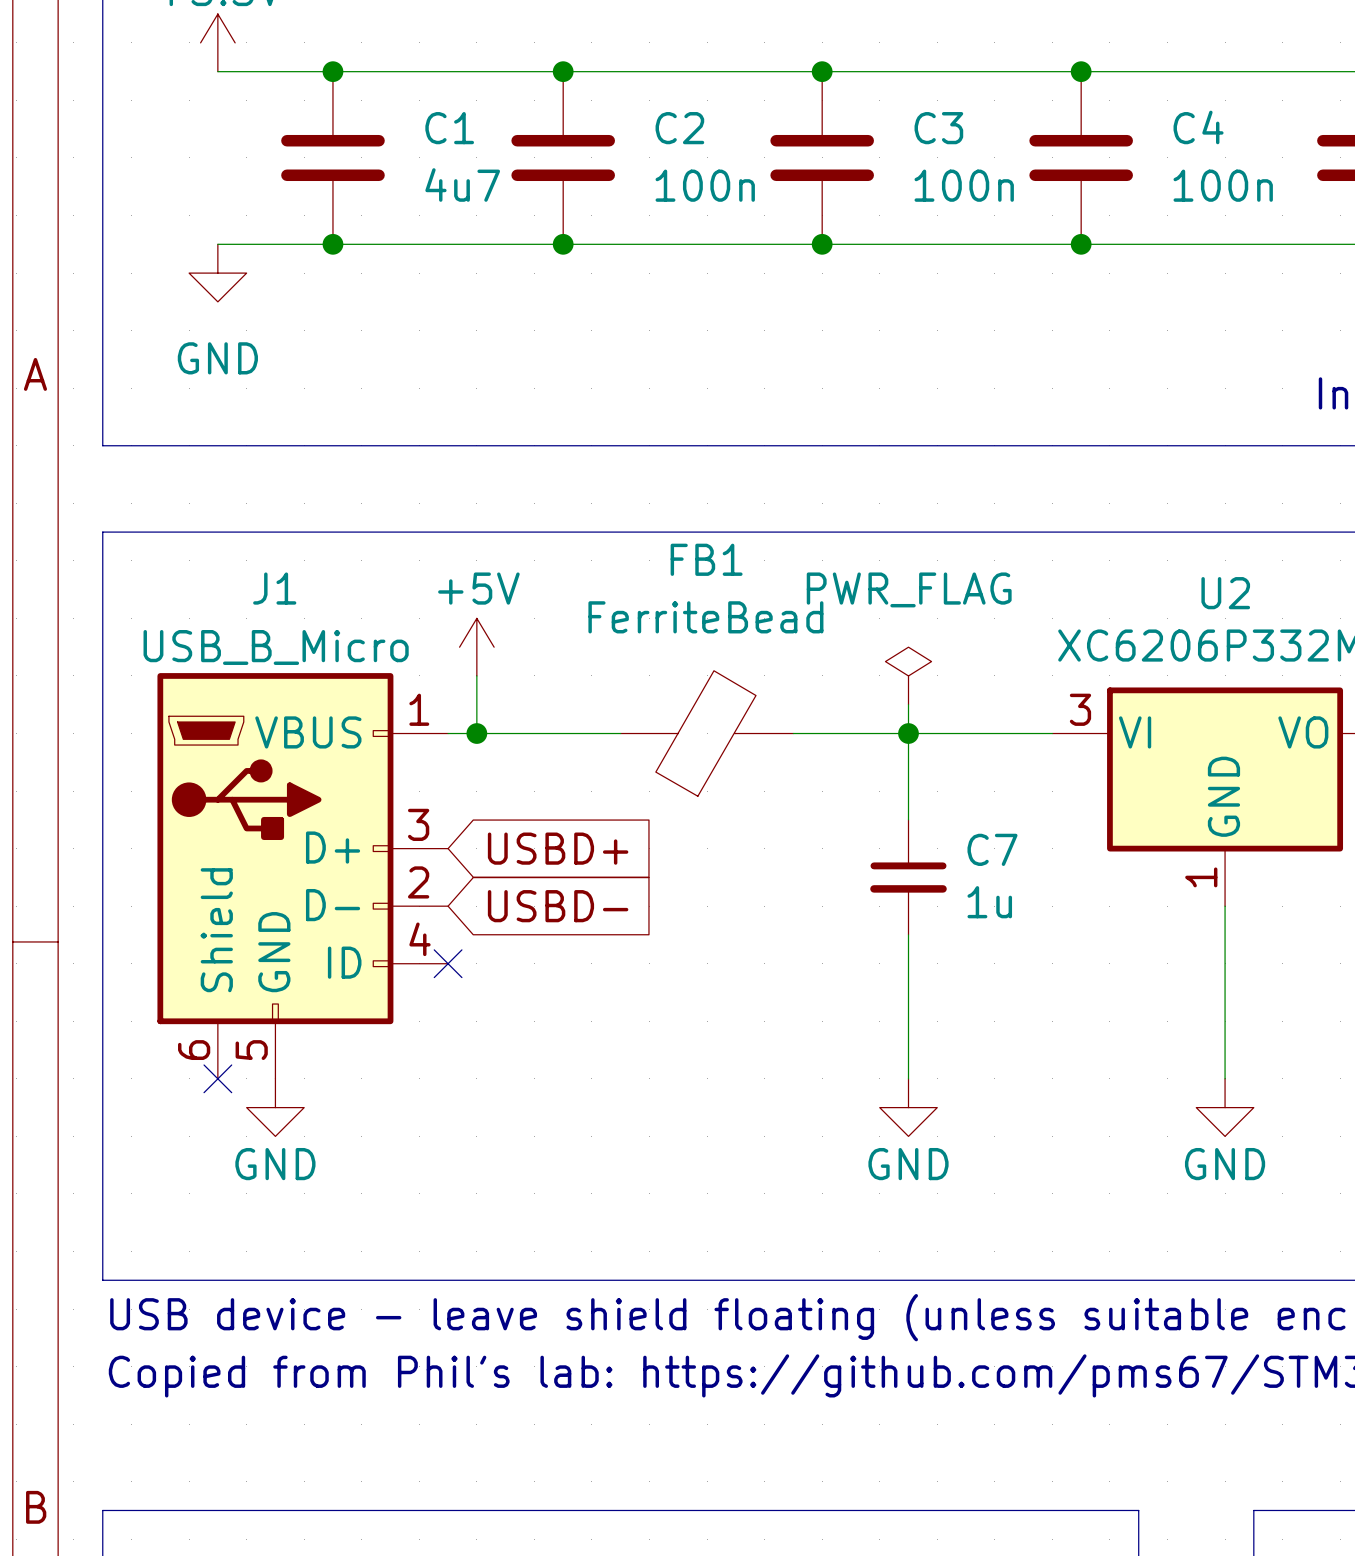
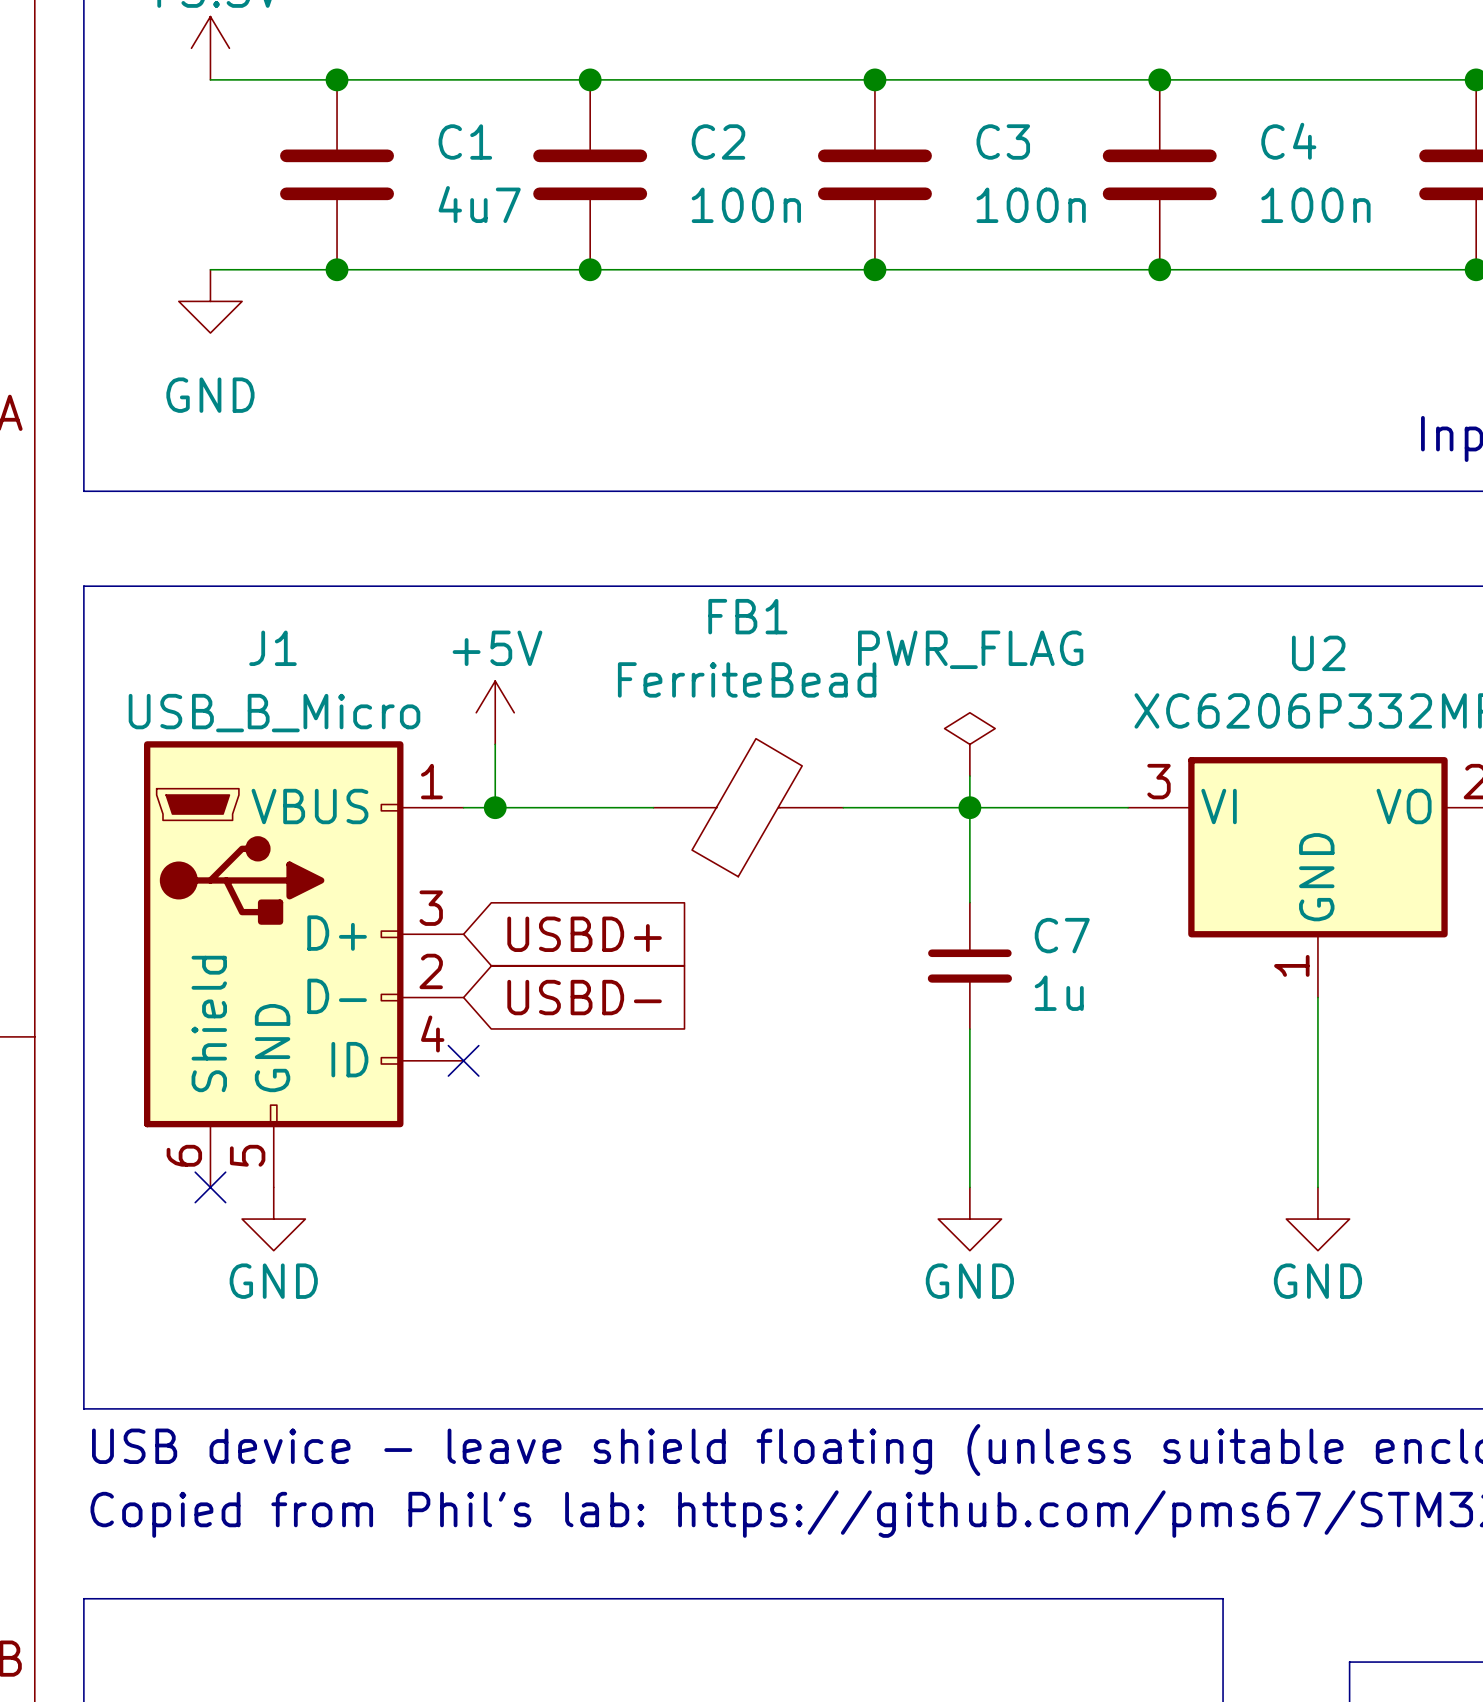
line: (102, 1510) (1138, 1510) -> (83, 1662) (83, 1598) (1223, 1598) (1223, 1662)

